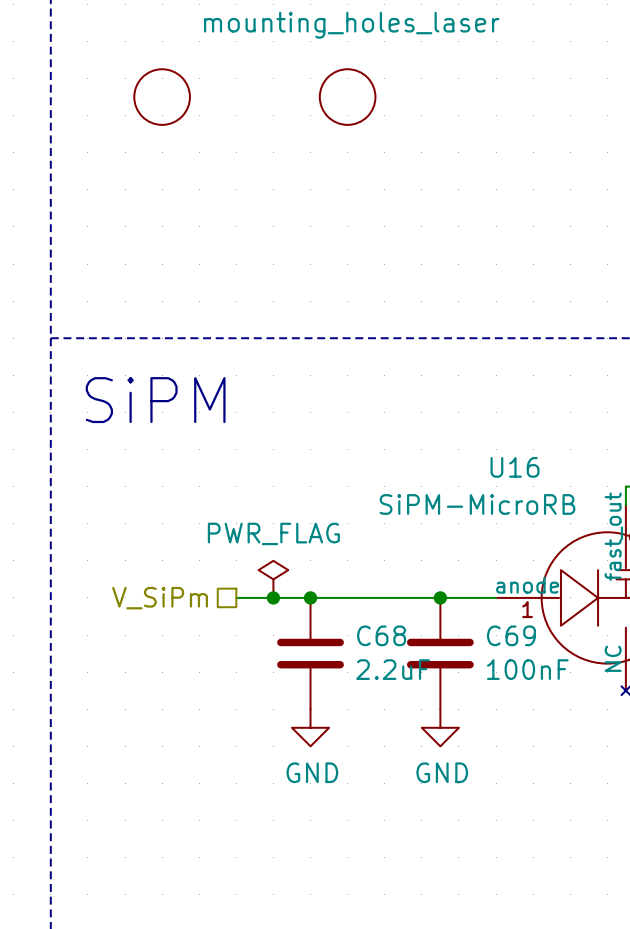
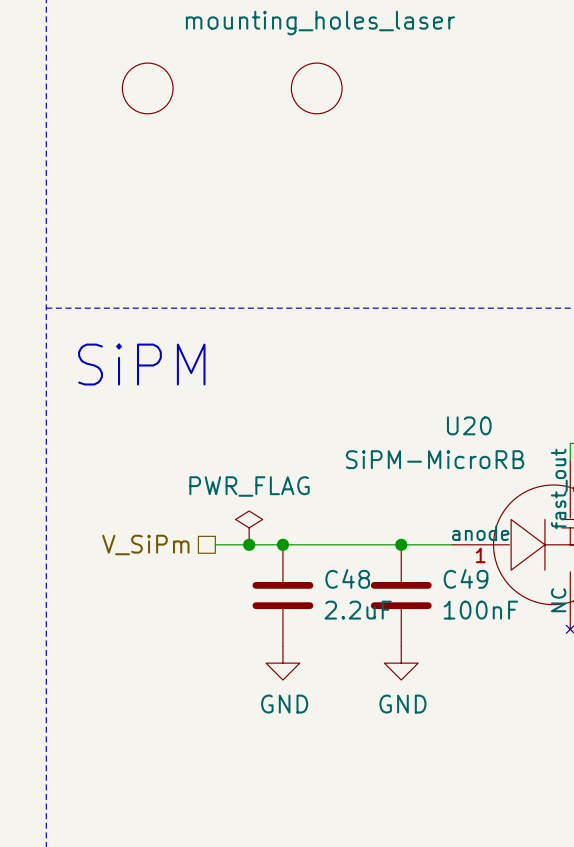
U16 name: U16 (515, 467) -> U20 (469, 425)
C68 name: C68 (381, 635) -> C48 (347, 578)
C69 name: C69 (511, 635) -> C49 (466, 578)

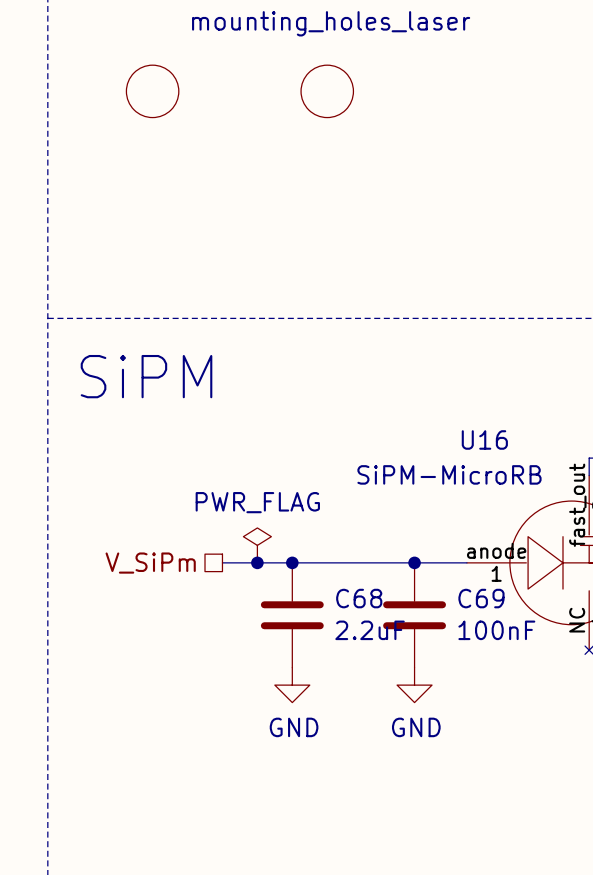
U20 name: U20 (469, 425) -> U16 (484, 439)
C48 name: C48 (347, 578) -> C68 (359, 598)
C49 name: C49 (466, 578) -> C69 (481, 598)

